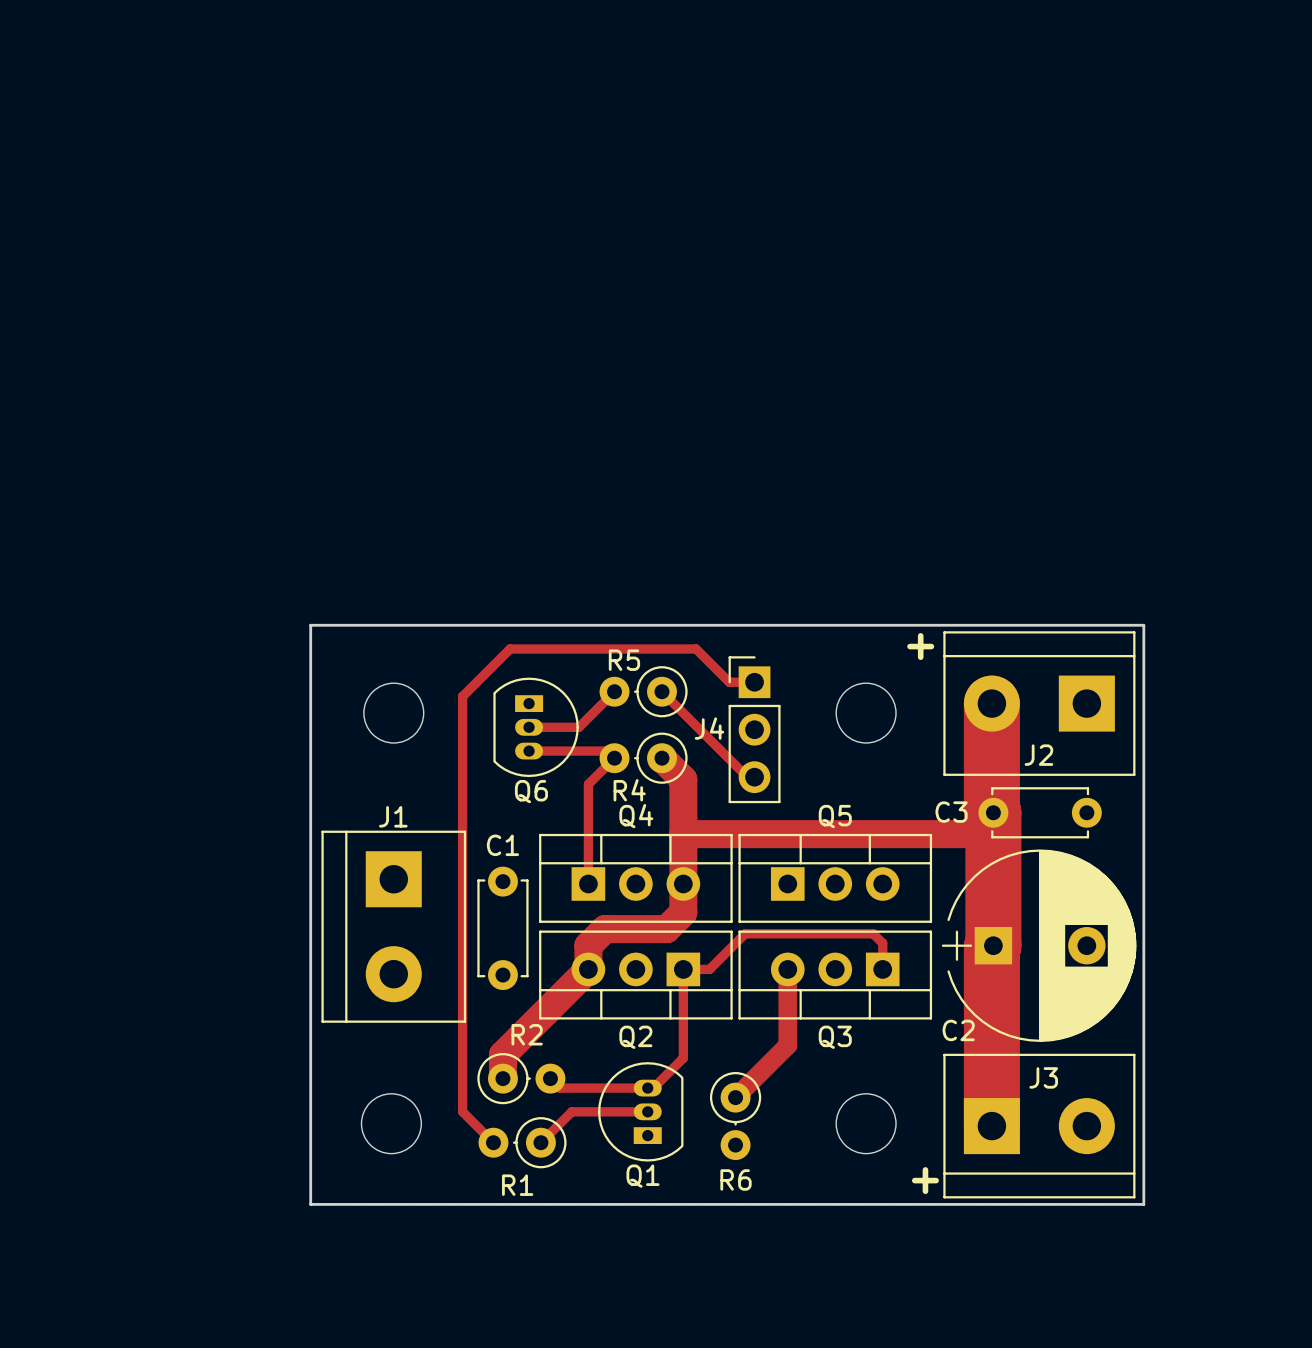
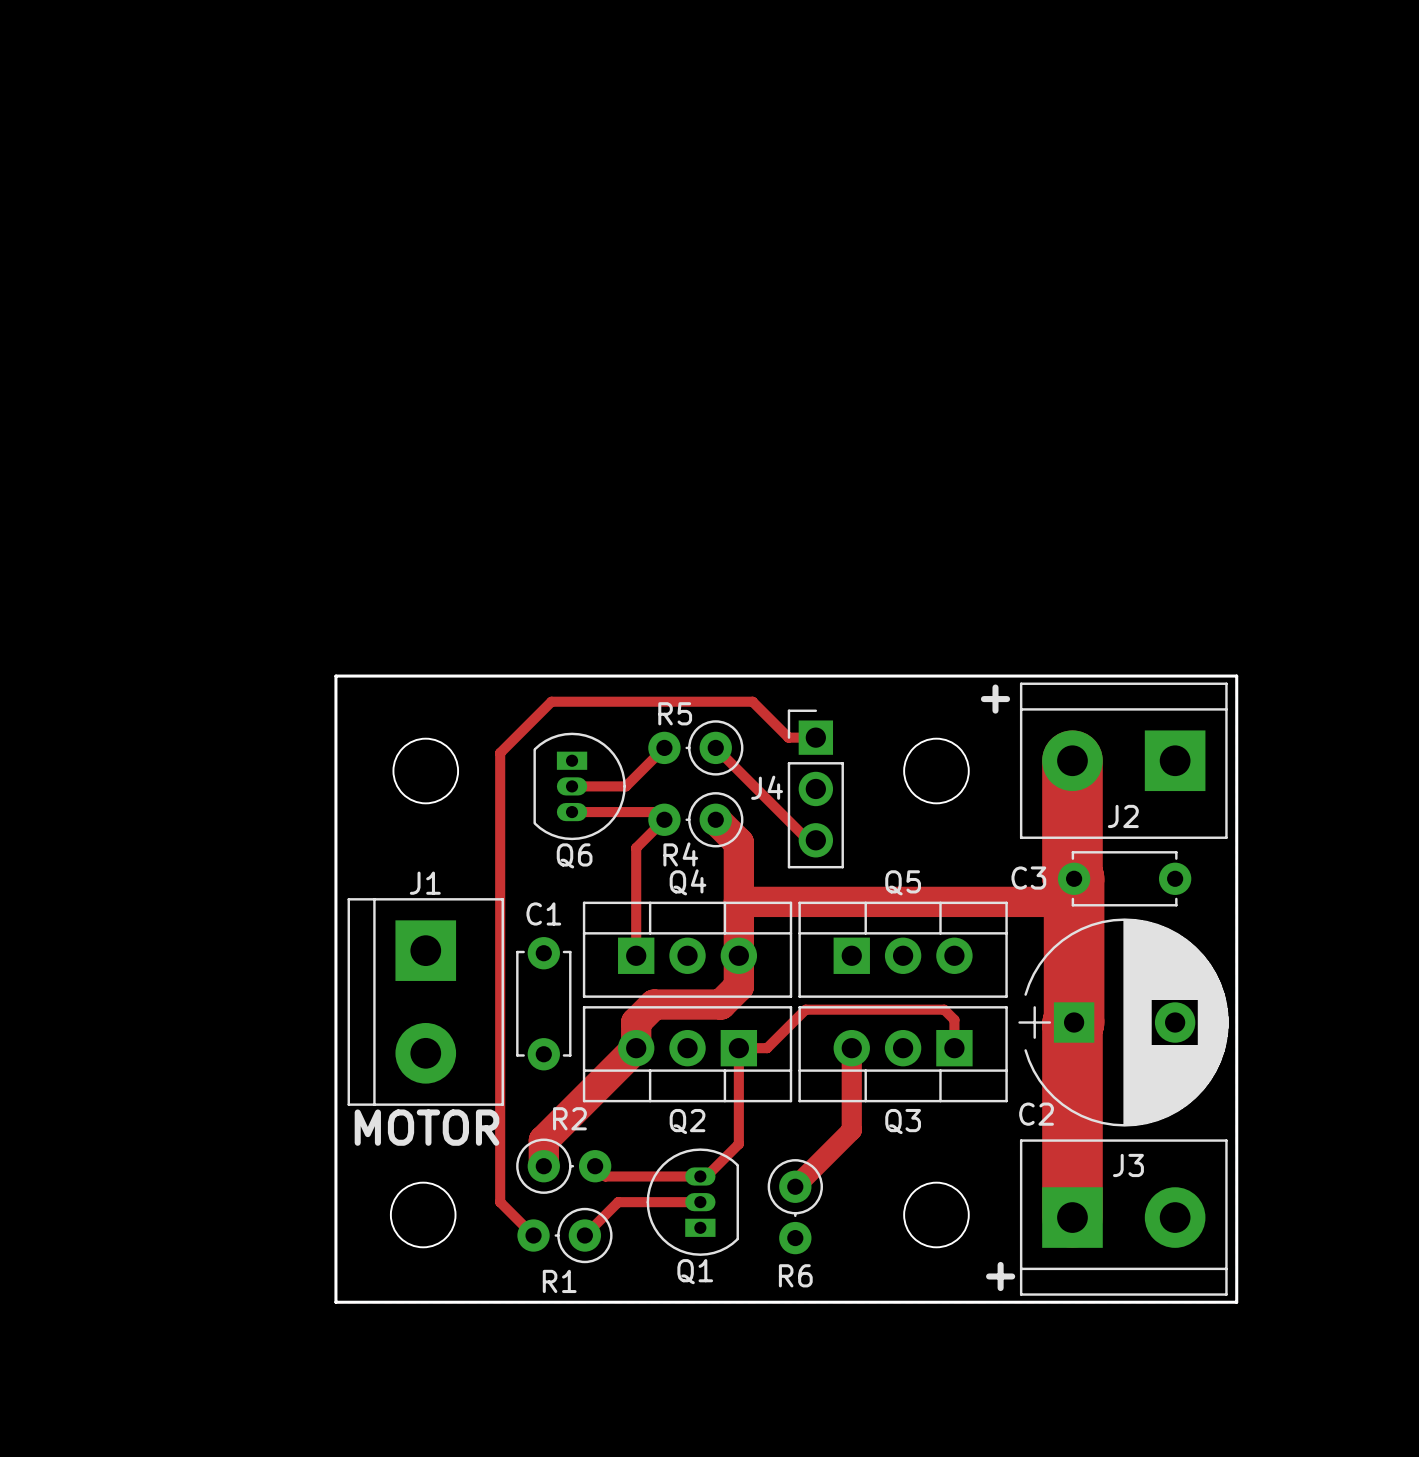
text: none -> MOTOR (427, 1127)

